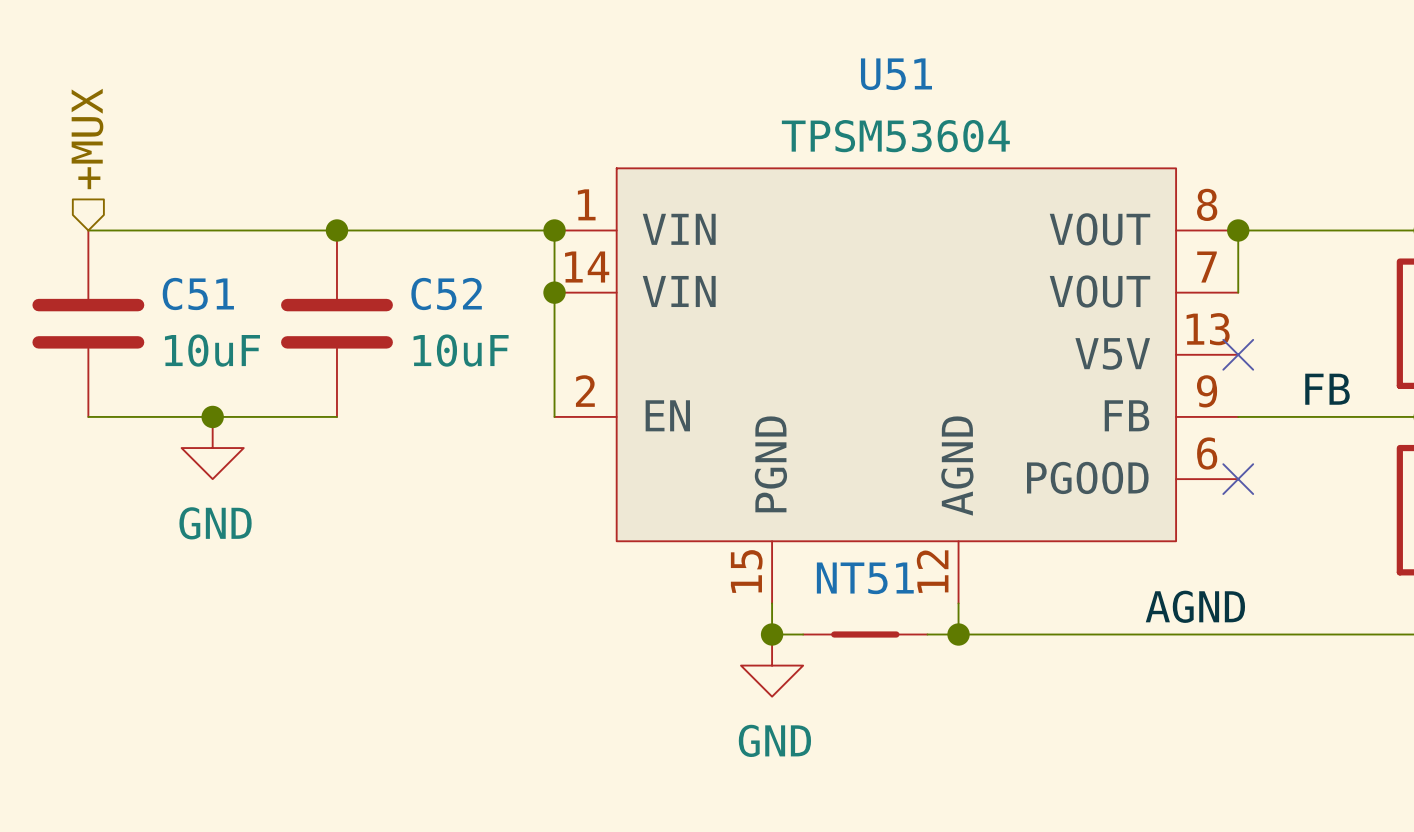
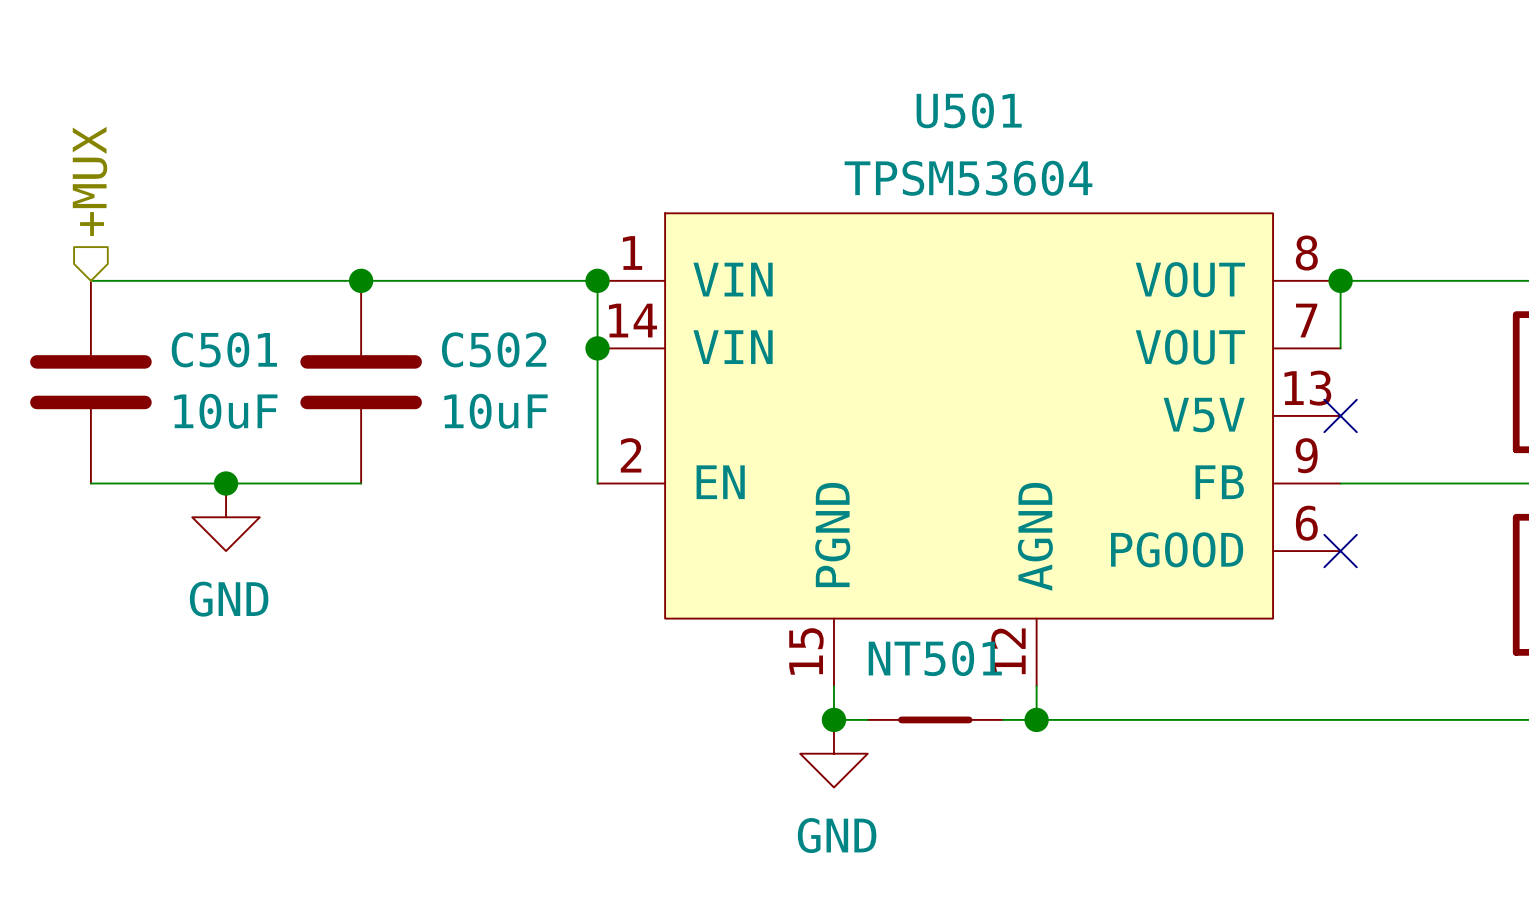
U51 name: U51 (896, 74) -> U501 (969, 110)
C51 name: C51 (198, 293) -> C501 (224, 349)
C52 name: C52 (446, 293) -> C502 (494, 349)
label: FB (1327, 389) -> none
NT51 name: NT51 (865, 578) -> NT501 (935, 658)
label: AGND (1195, 606) -> none

